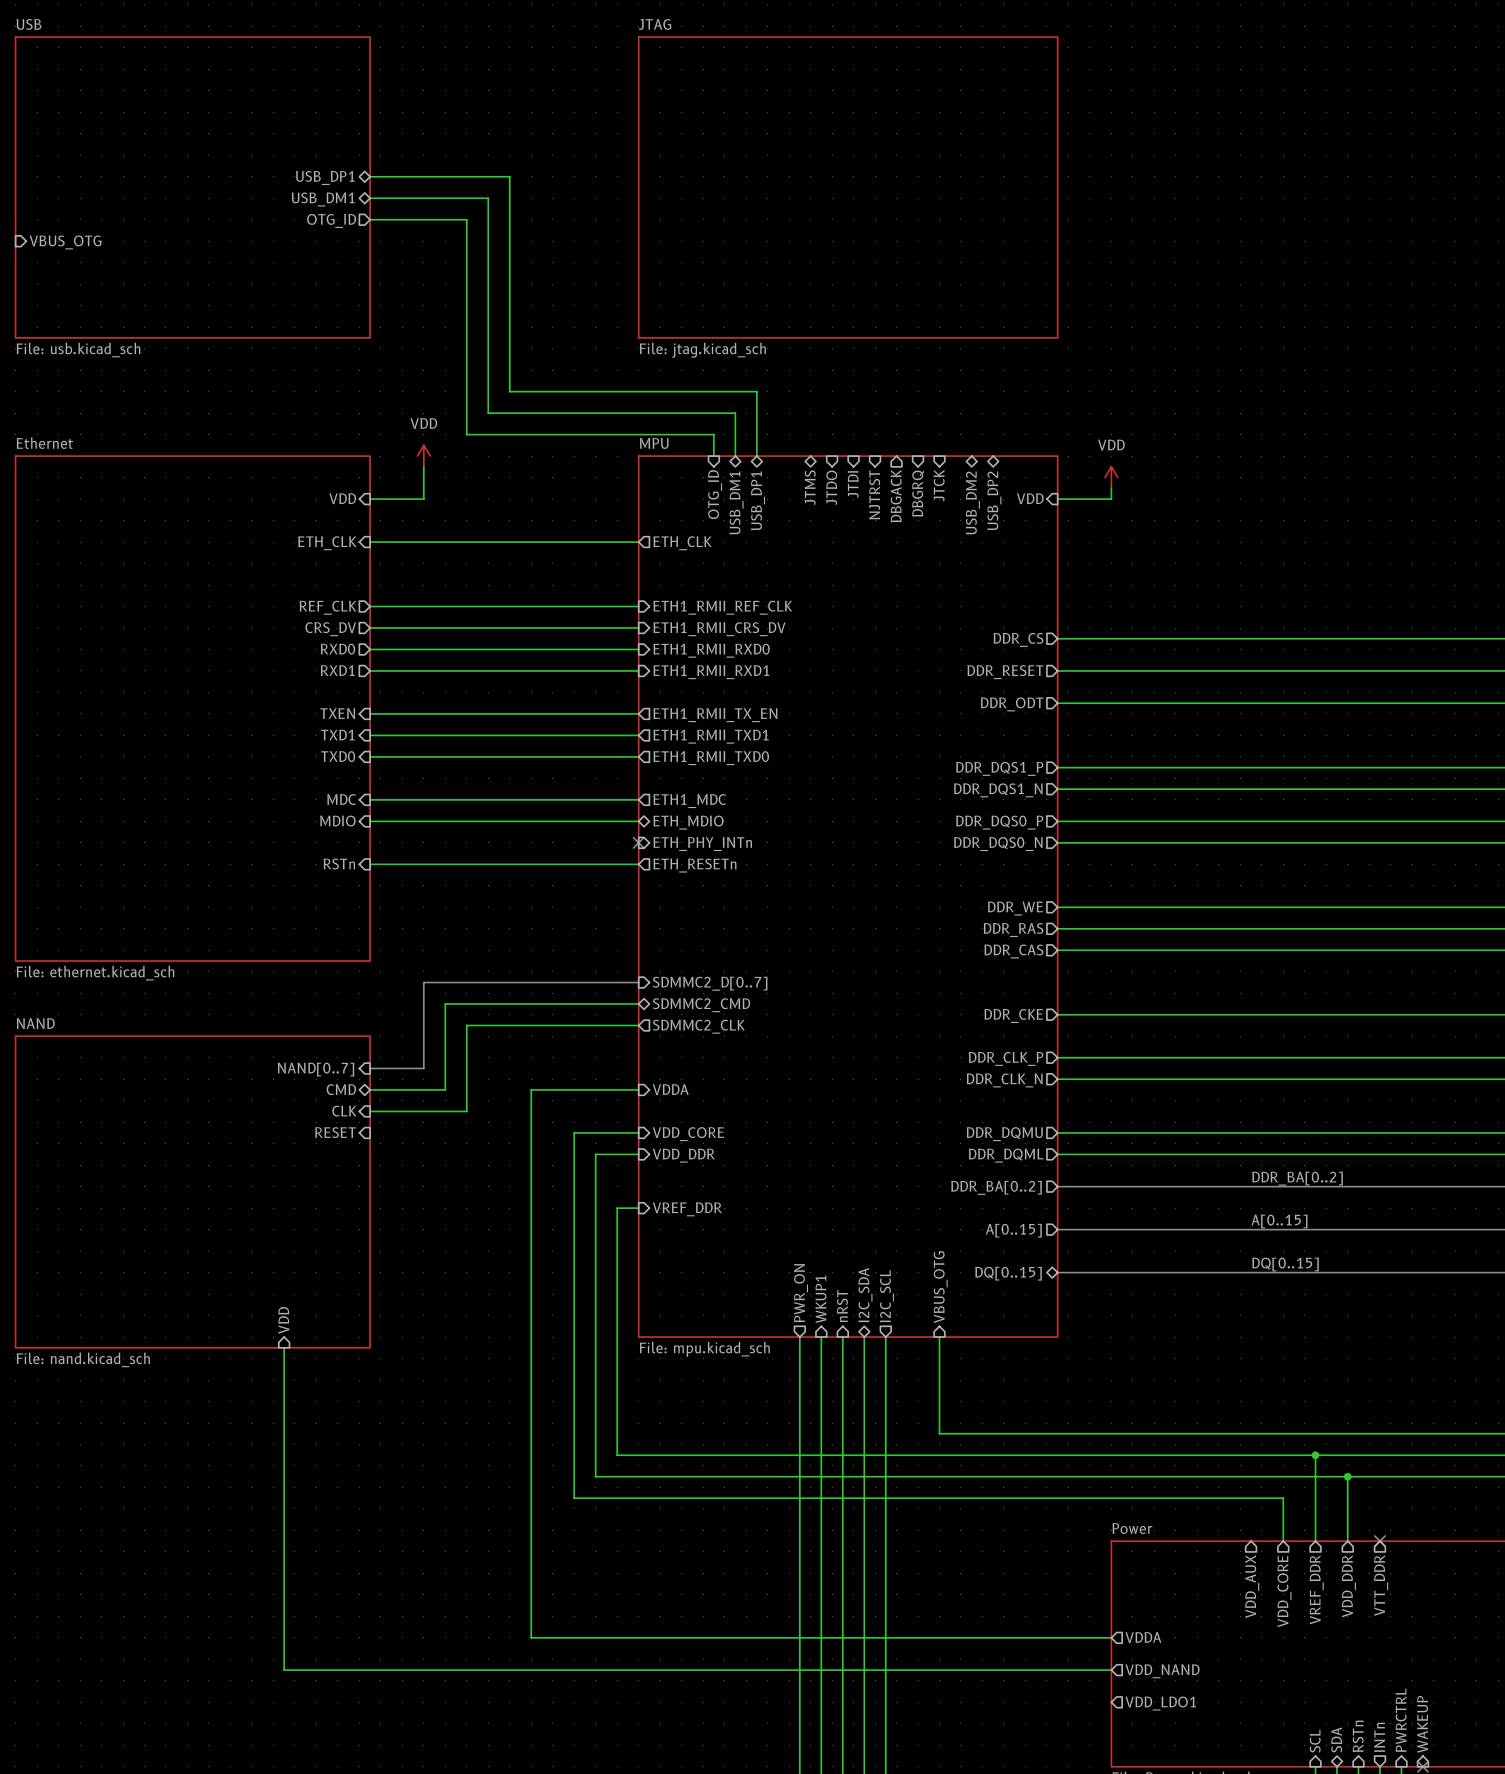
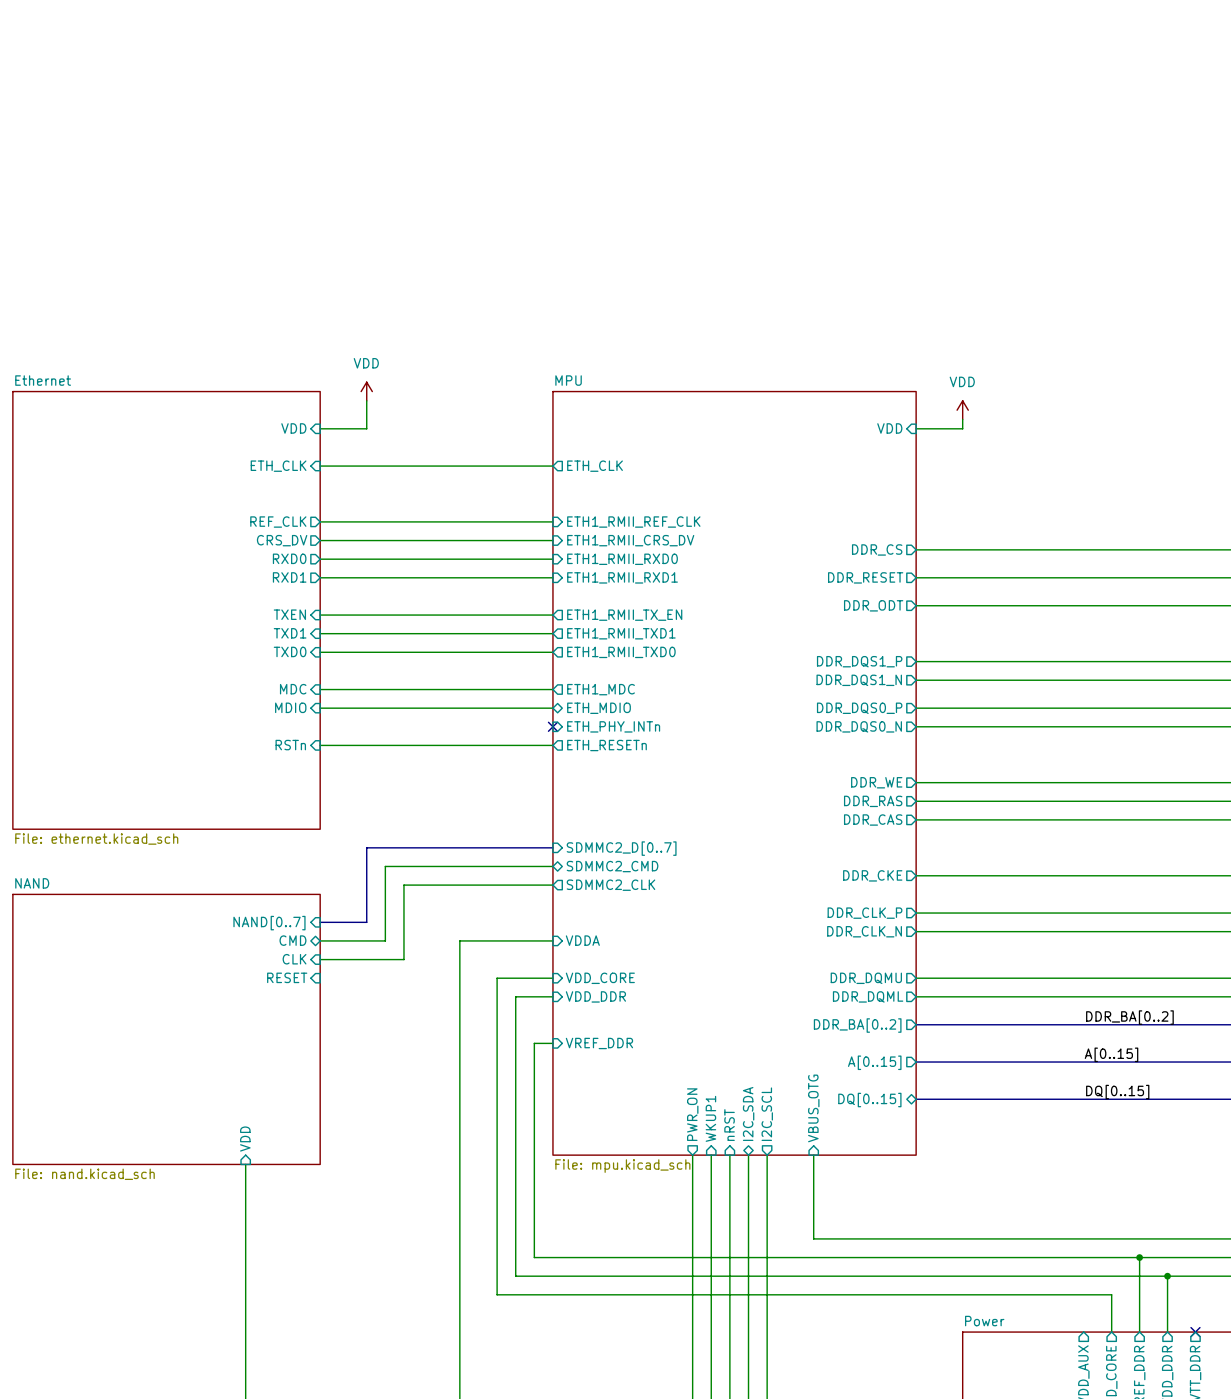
wire: (370, 176) (509, 176) (509, 391) (756, 391) (756, 456) -> none
sheet pin: USB_DP1 (325, 177) -> none
sheet USB: File: usb.kicad_sch (192, 187) -> none
sheet JTAG: File: jtag.kicad_sch (848, 187) -> none
wire: (370, 198) (488, 198) (488, 413) (735, 413) (735, 456) -> none
sheet pin: USB_DM1 (323, 199) -> none
wire: (370, 219) (466, 219) (466, 434) (713, 434) (713, 456) -> none
sheet pin: OTG_ID (331, 220) -> none
sheet pin: VBUS_OTG (65, 242) -> none
sheet pin: JTDI (853, 484) -> none
sheet pin: JTCK (939, 485) -> none
sheet pin: JTMS (810, 487) -> none
sheet pin: JTDO (831, 487) -> none
sheet pin: DBGRQ (918, 493) -> none
sheet pin: OTG_ID (715, 494) -> none
sheet pin: NJTRST (874, 494) -> none
sheet pin: DBGACK (896, 496) -> none
sheet pin: USB_DP1 (758, 500) -> none
sheet pin: USB_DP2 (994, 500) -> none
sheet pin: USB_DM1 (736, 502) -> none
sheet pin: USB_DM2 (972, 502) -> none

